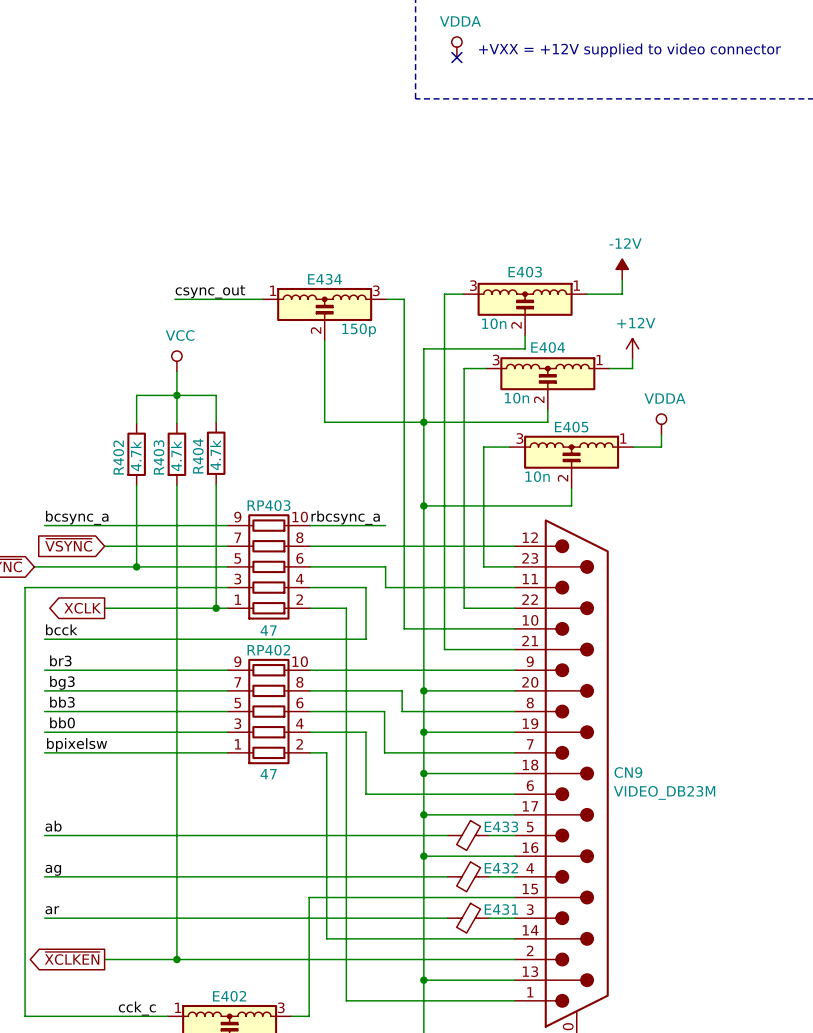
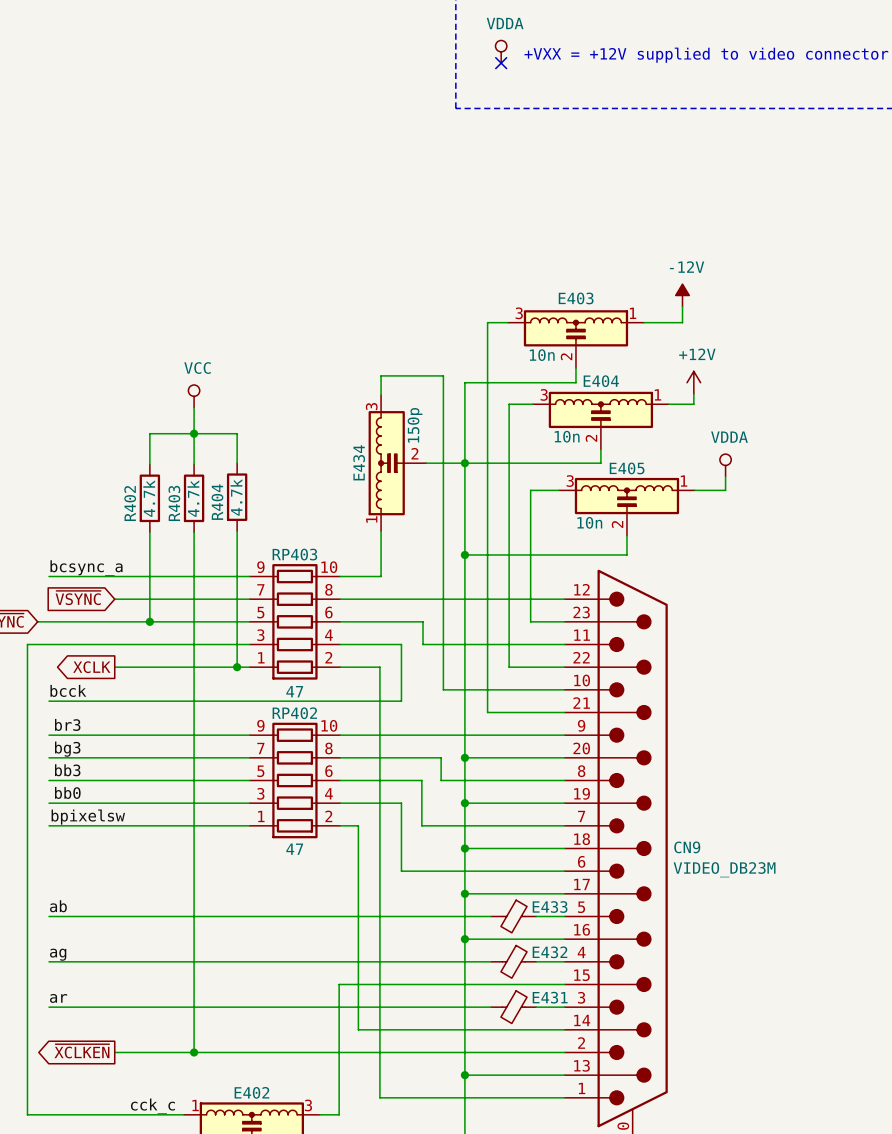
label: csync_out (210, 291) -> none
wire: (174, 299) (262, 299) -> none
wire: (386, 299) (404, 299) (404, 342) -> (381, 395) (381, 375) (443, 375)
E434 rotation: 0° (324, 304) -> 90° counterclockwise (386, 463)
E434 position: (324, 314) -> (397, 463)
wire: (324, 340) (324, 422) (388, 422) -> none
label: rbcsync_a (345, 517) -> none
wire: (347, 525) (385, 525) -> (381, 576) (381, 531)

